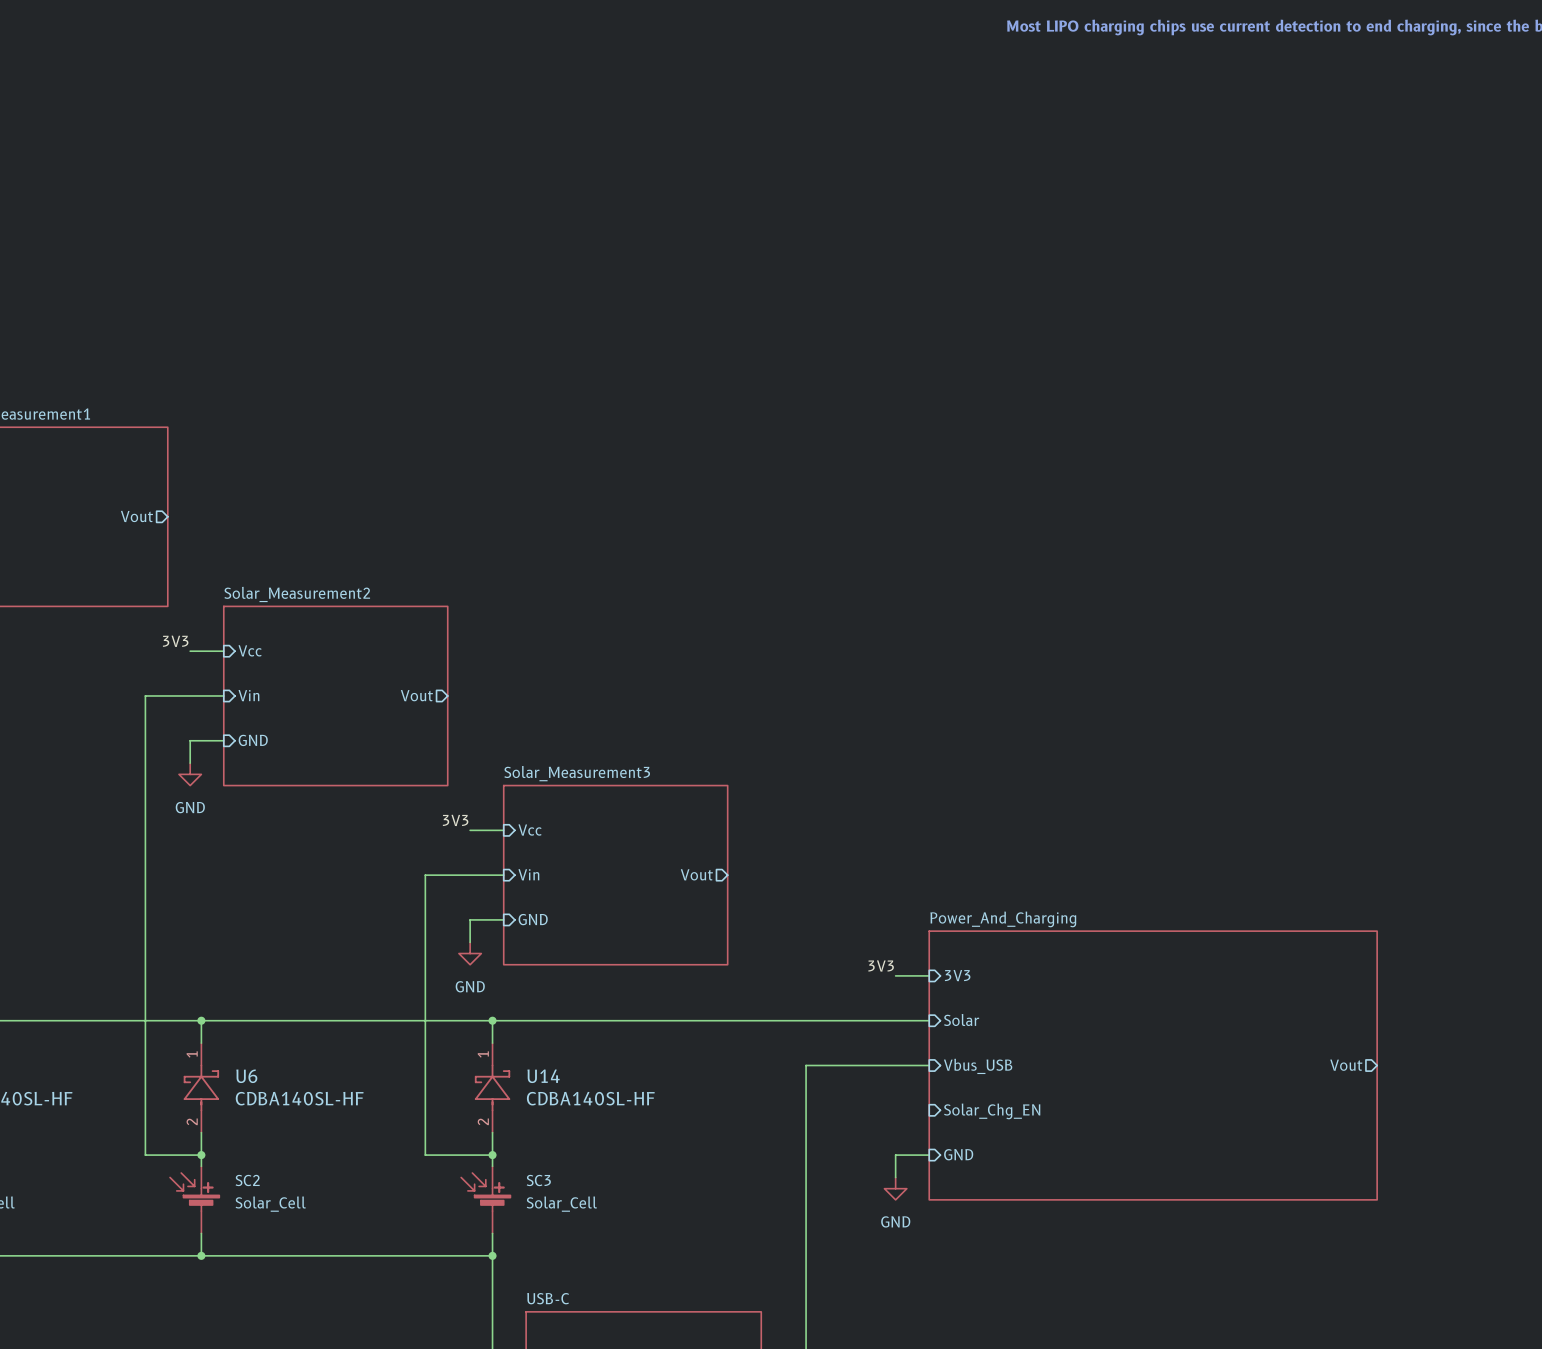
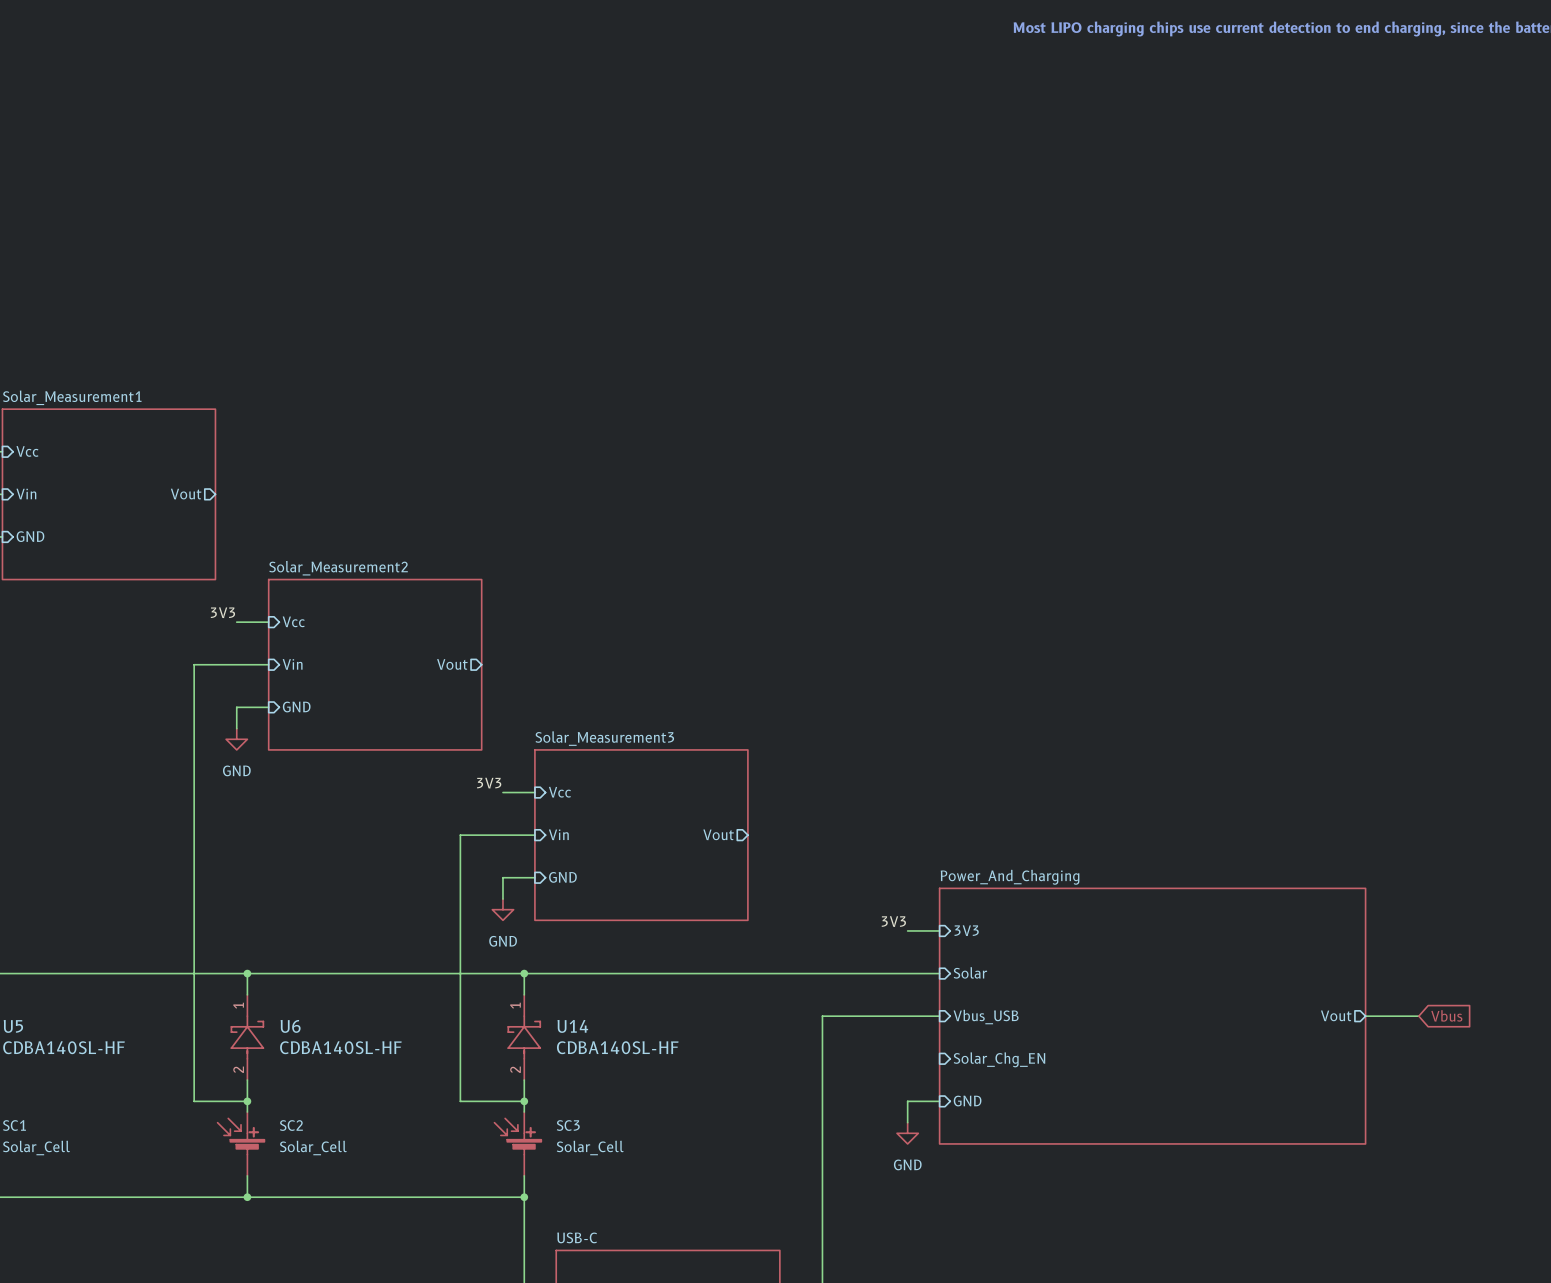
wire: none -> (1365, 1016) (1418, 1016)
global label: none -> Vbus (1446, 1015)

